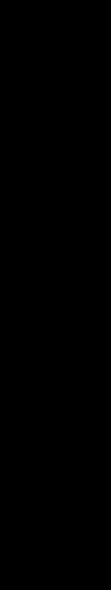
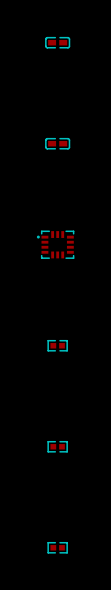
part: none -> (57, 42)
part: none -> (57, 143)
part: none -> (55, 244)
part: none -> (57, 345)
part: none -> (57, 446)
part: none -> (57, 547)

